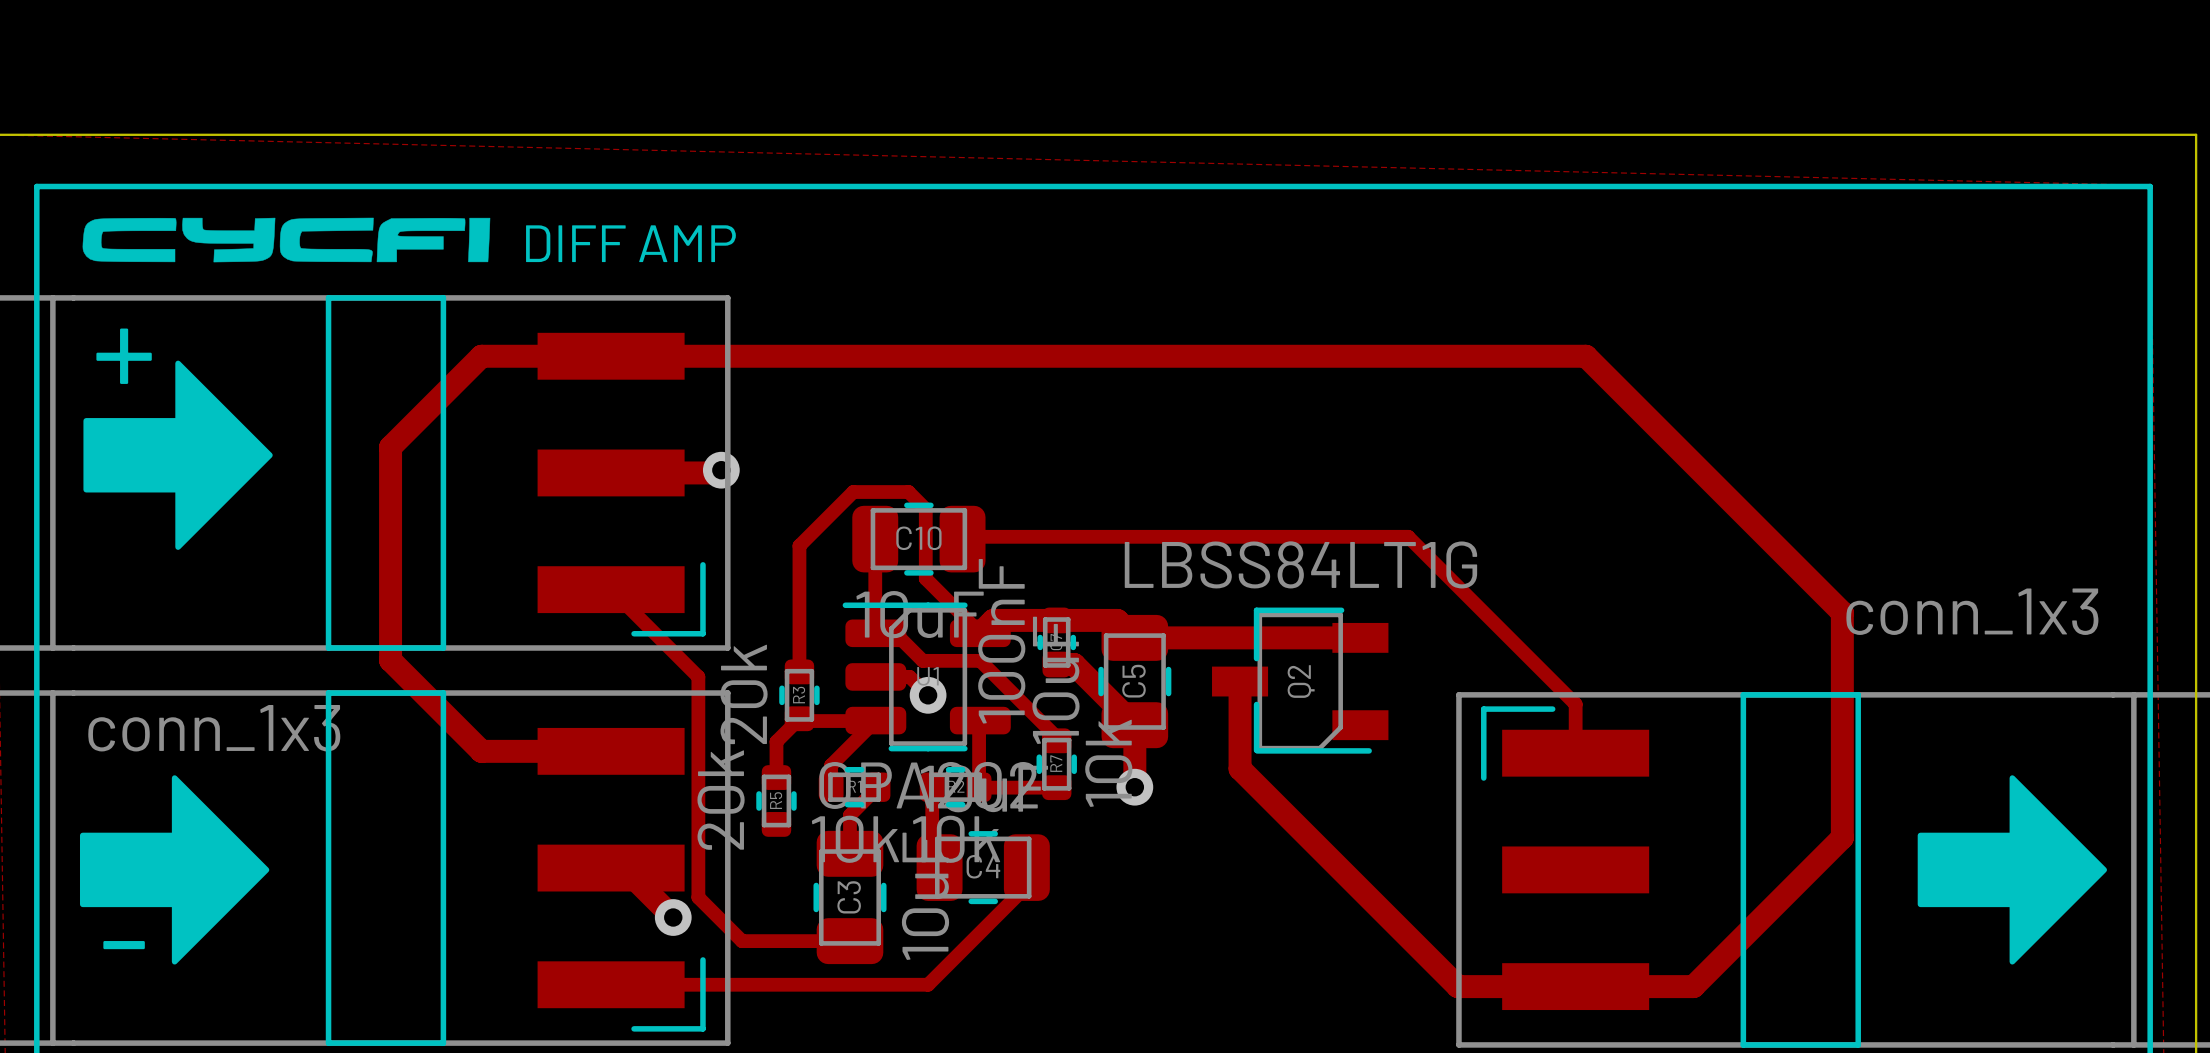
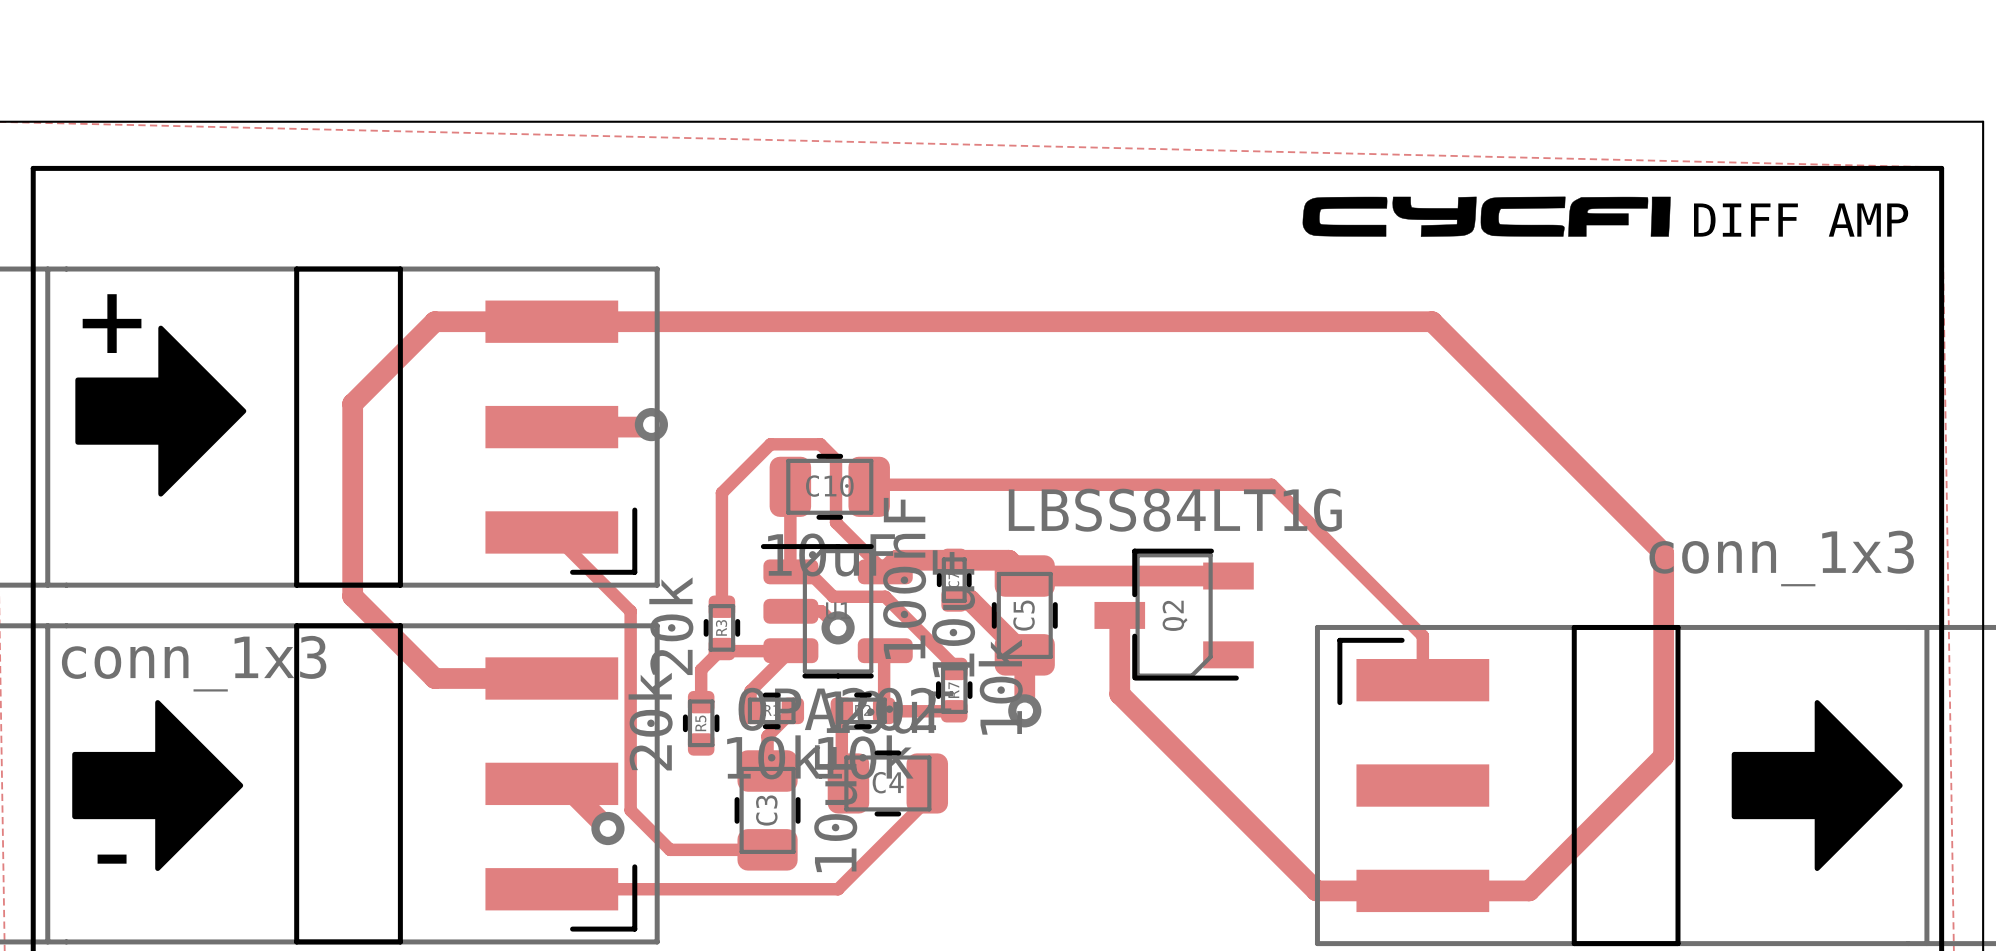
drawing: [82, 217, 491, 263] -> none
drawing: none -> [1302, 196, 1671, 237]
text: DIFF AMP (630, 243) -> none
text: none -> DIFF AMP (1801, 220)

